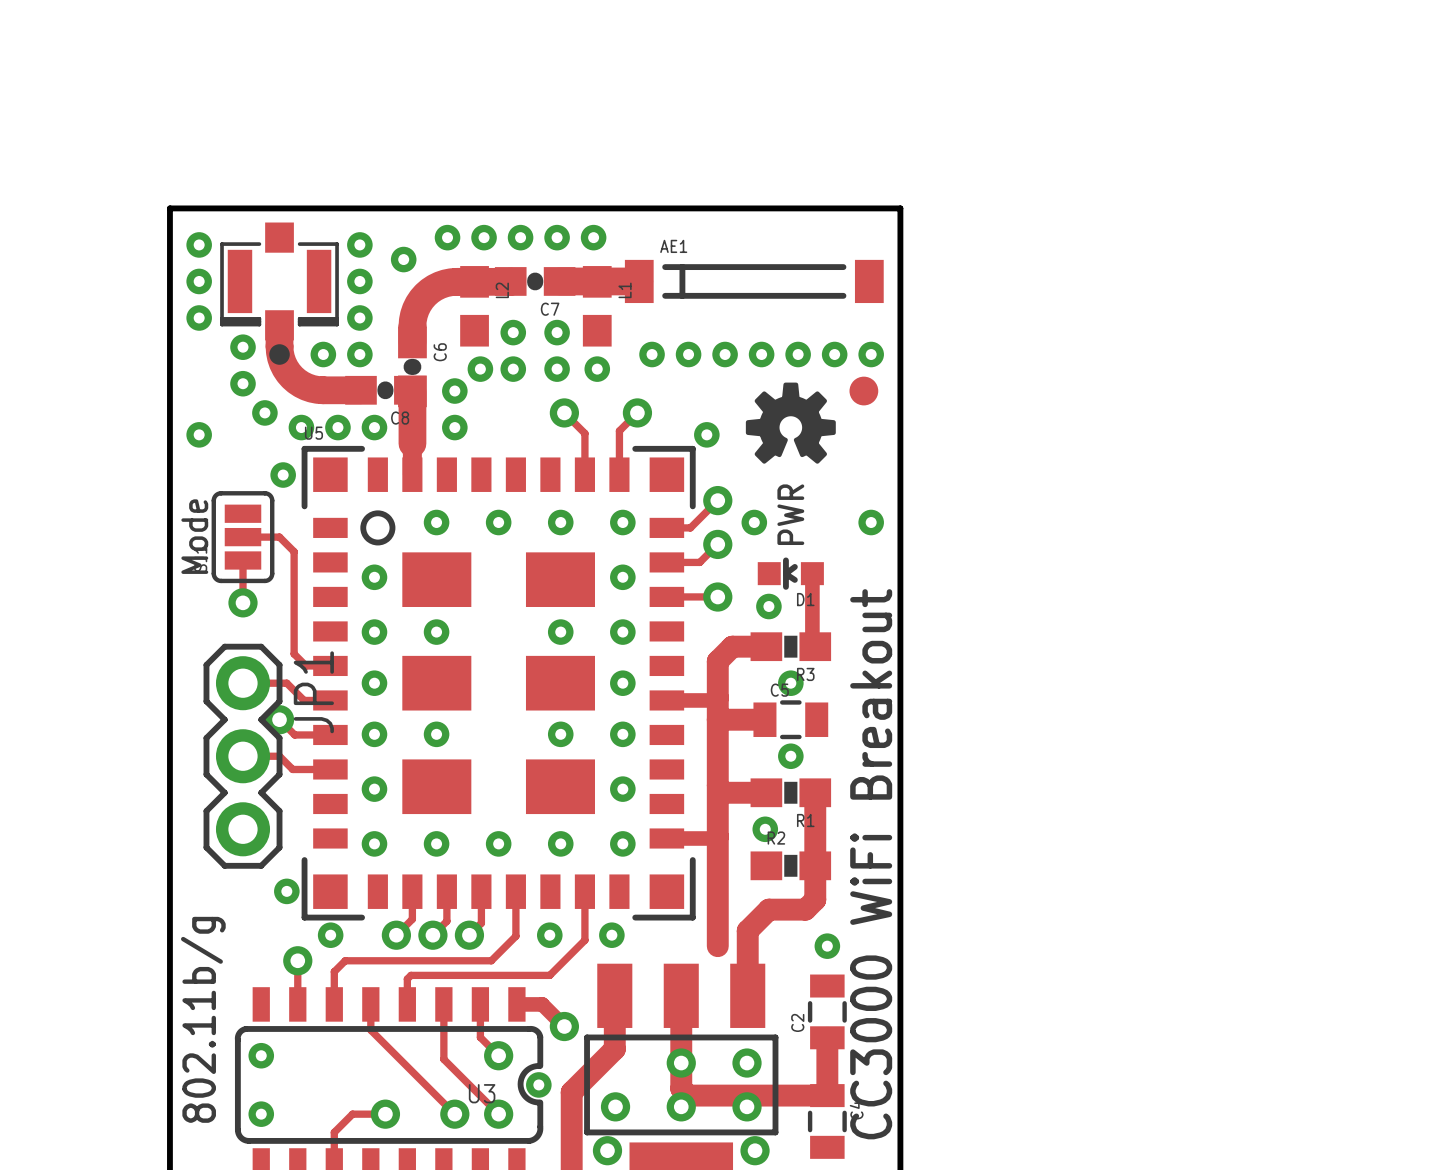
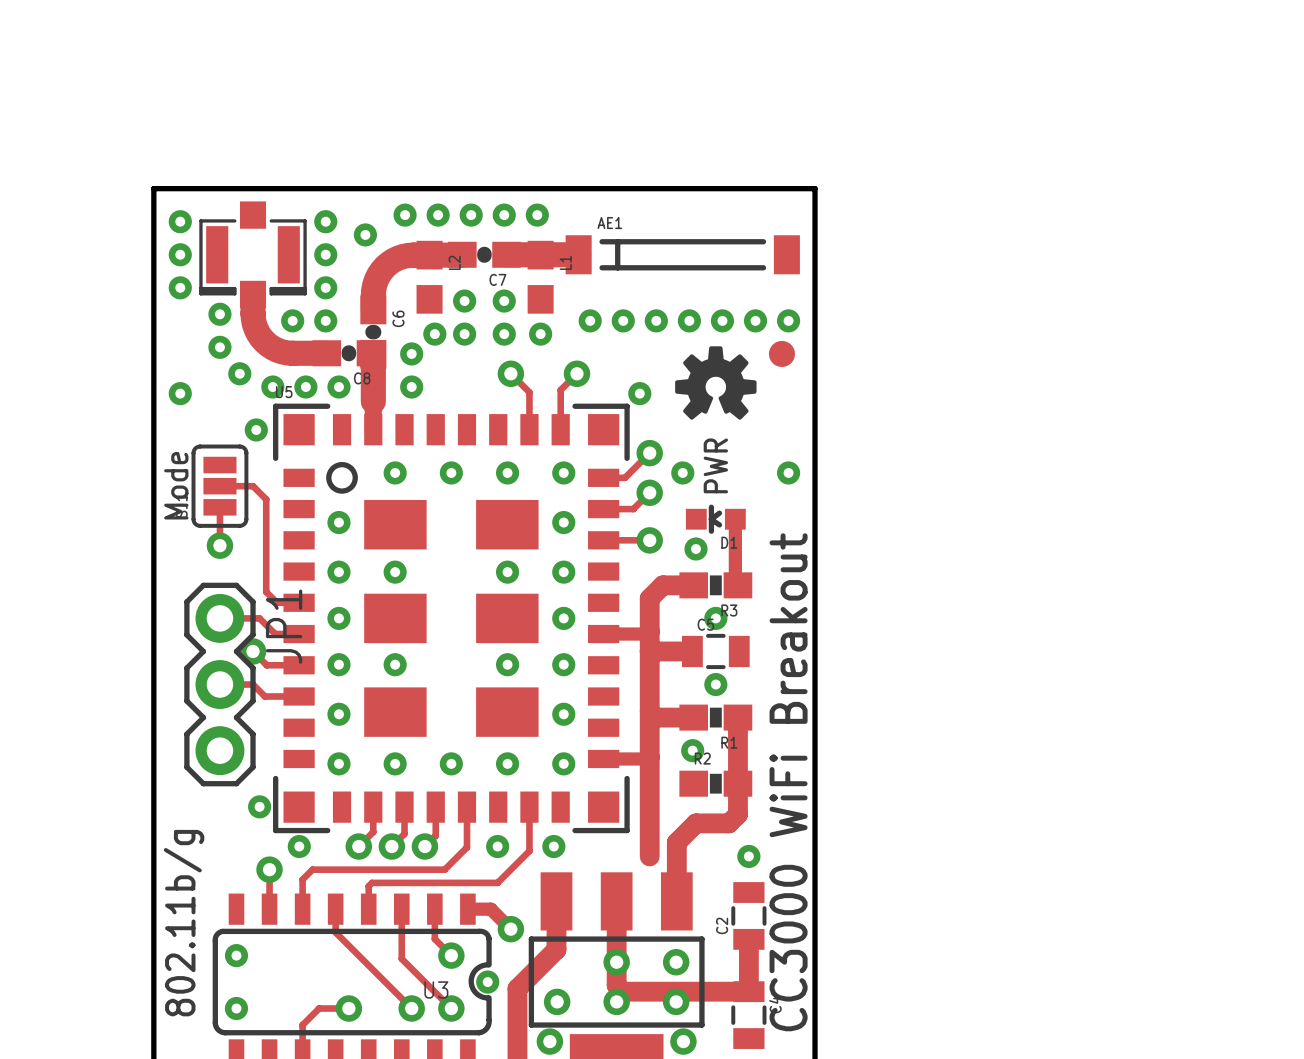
drawing: [269, 344, 290, 365] -> none

